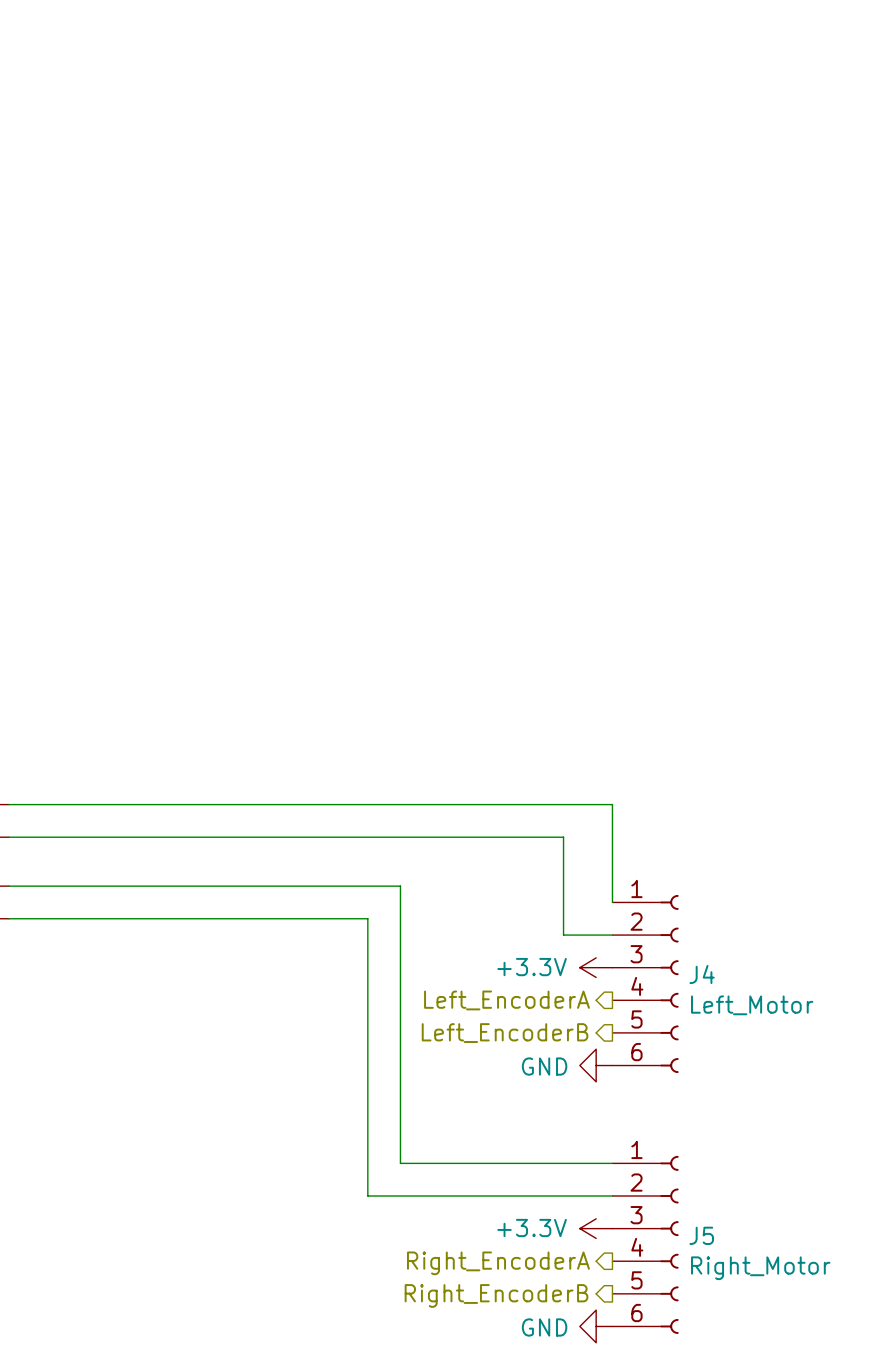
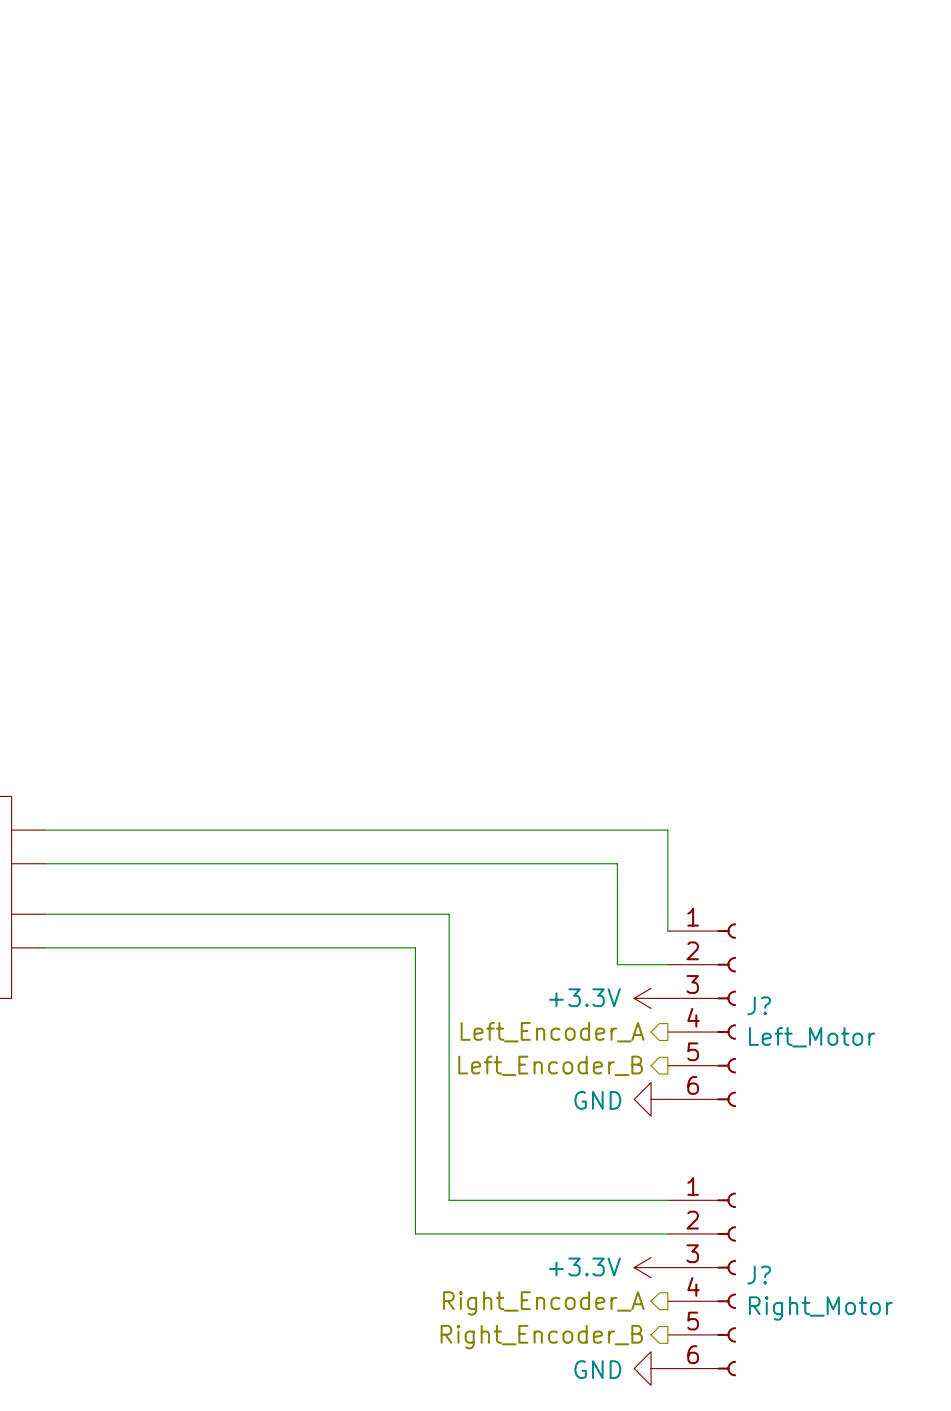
J4 name: J4 (702, 974) -> J? (759, 1005)
hierarchical label: Left_EncoderA (506, 1000) -> Left_Encoder_A (552, 1032)
hierarchical label: Left_EncoderB (505, 1033) -> Left_Encoder_B (550, 1065)
J5 name: J5 (701, 1235) -> J? (759, 1275)
hierarchical label: Right_EncoderA (498, 1263) -> Right_Encoder_A (543, 1303)
hierarchical label: Right_EncoderB (496, 1295) -> Right_Encoder_B (541, 1337)

